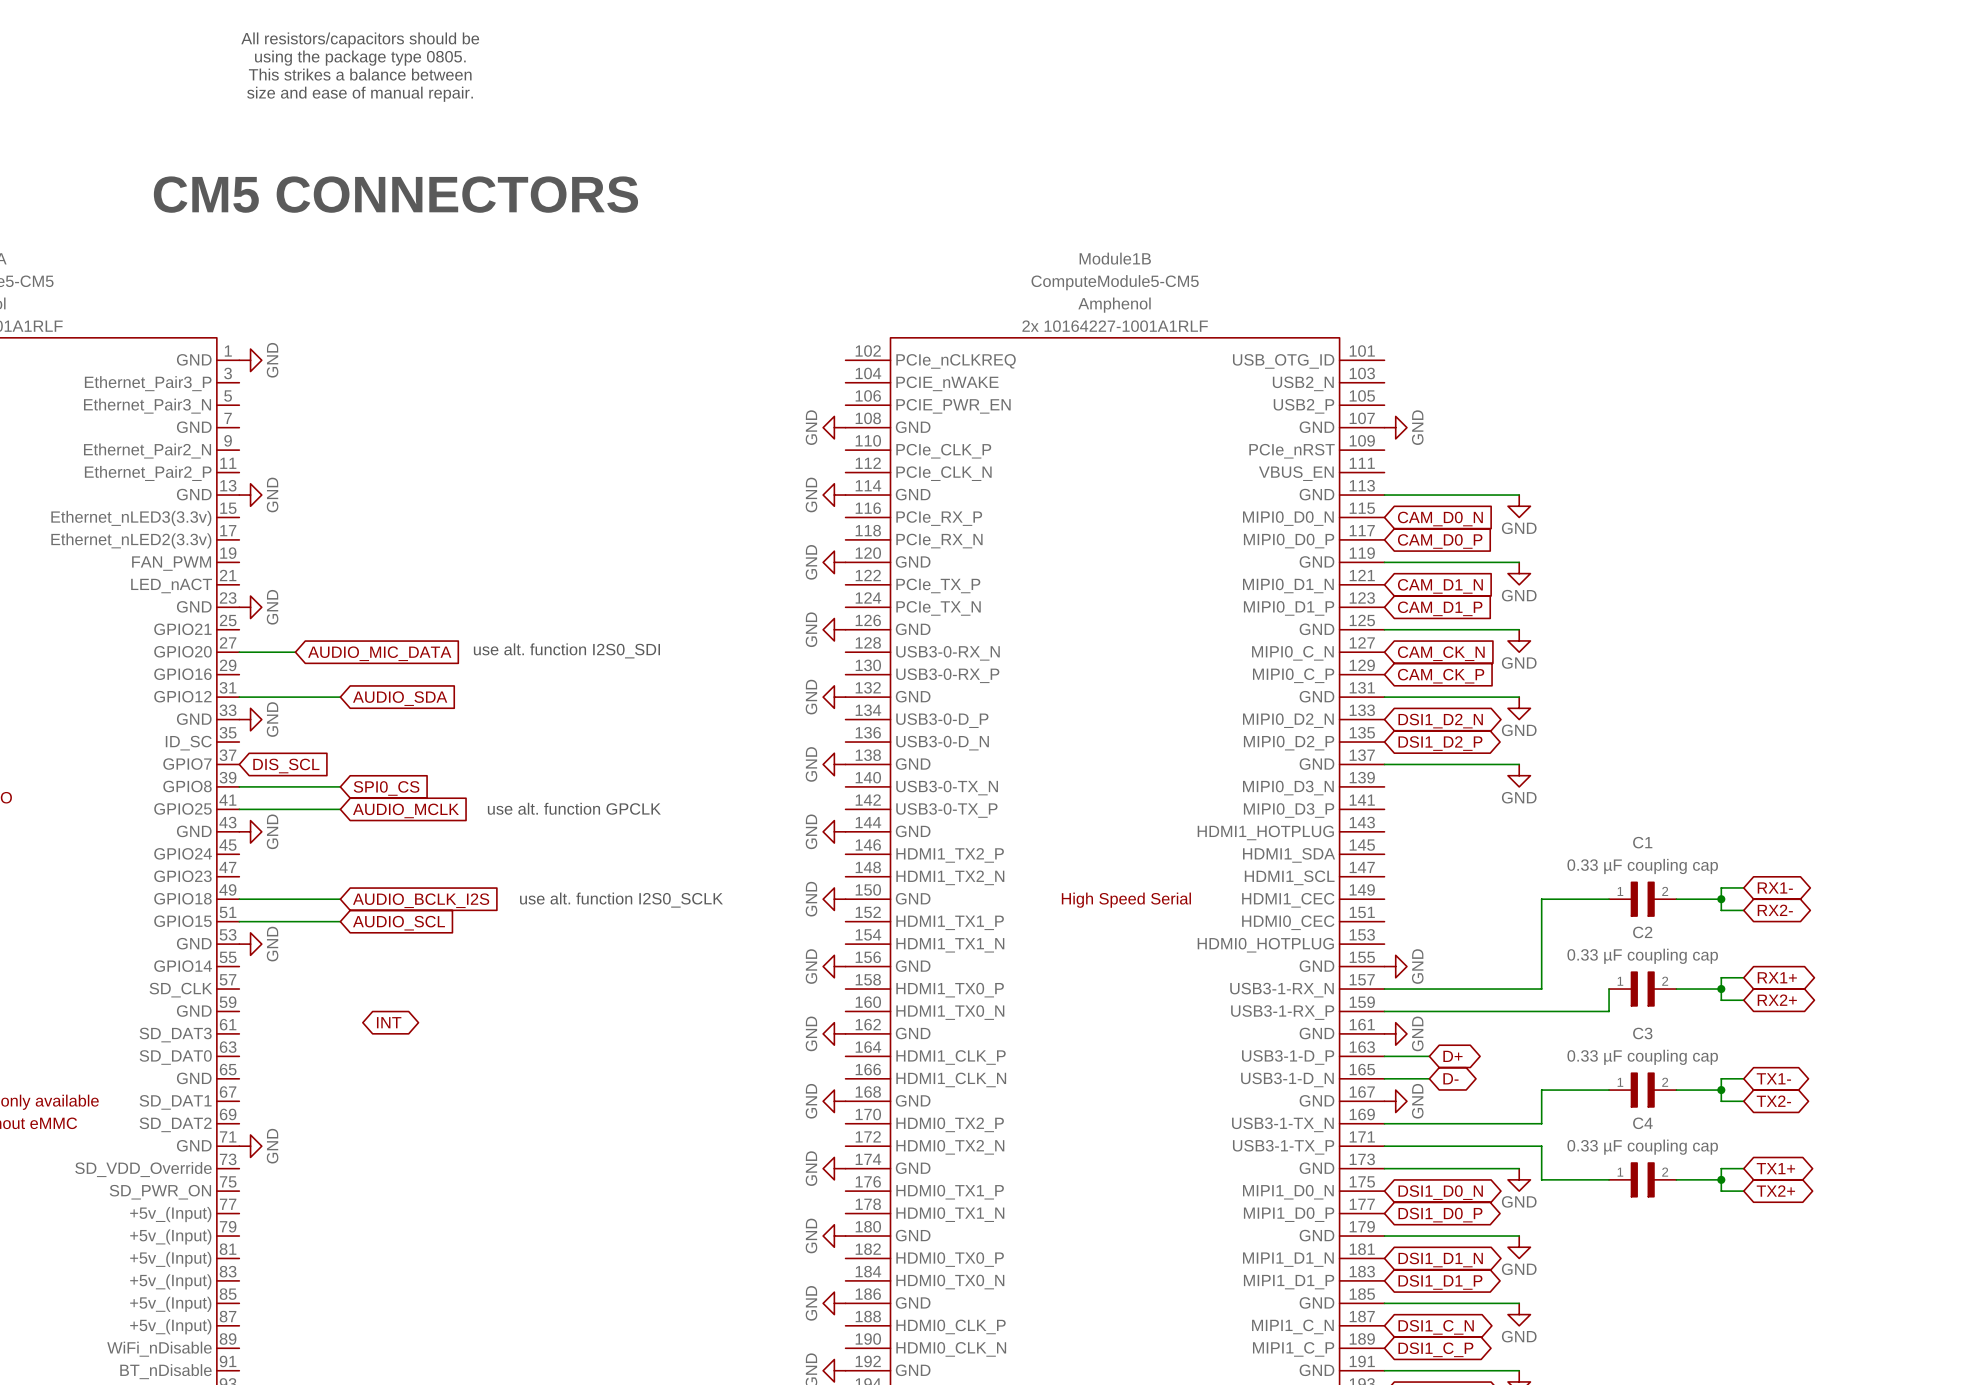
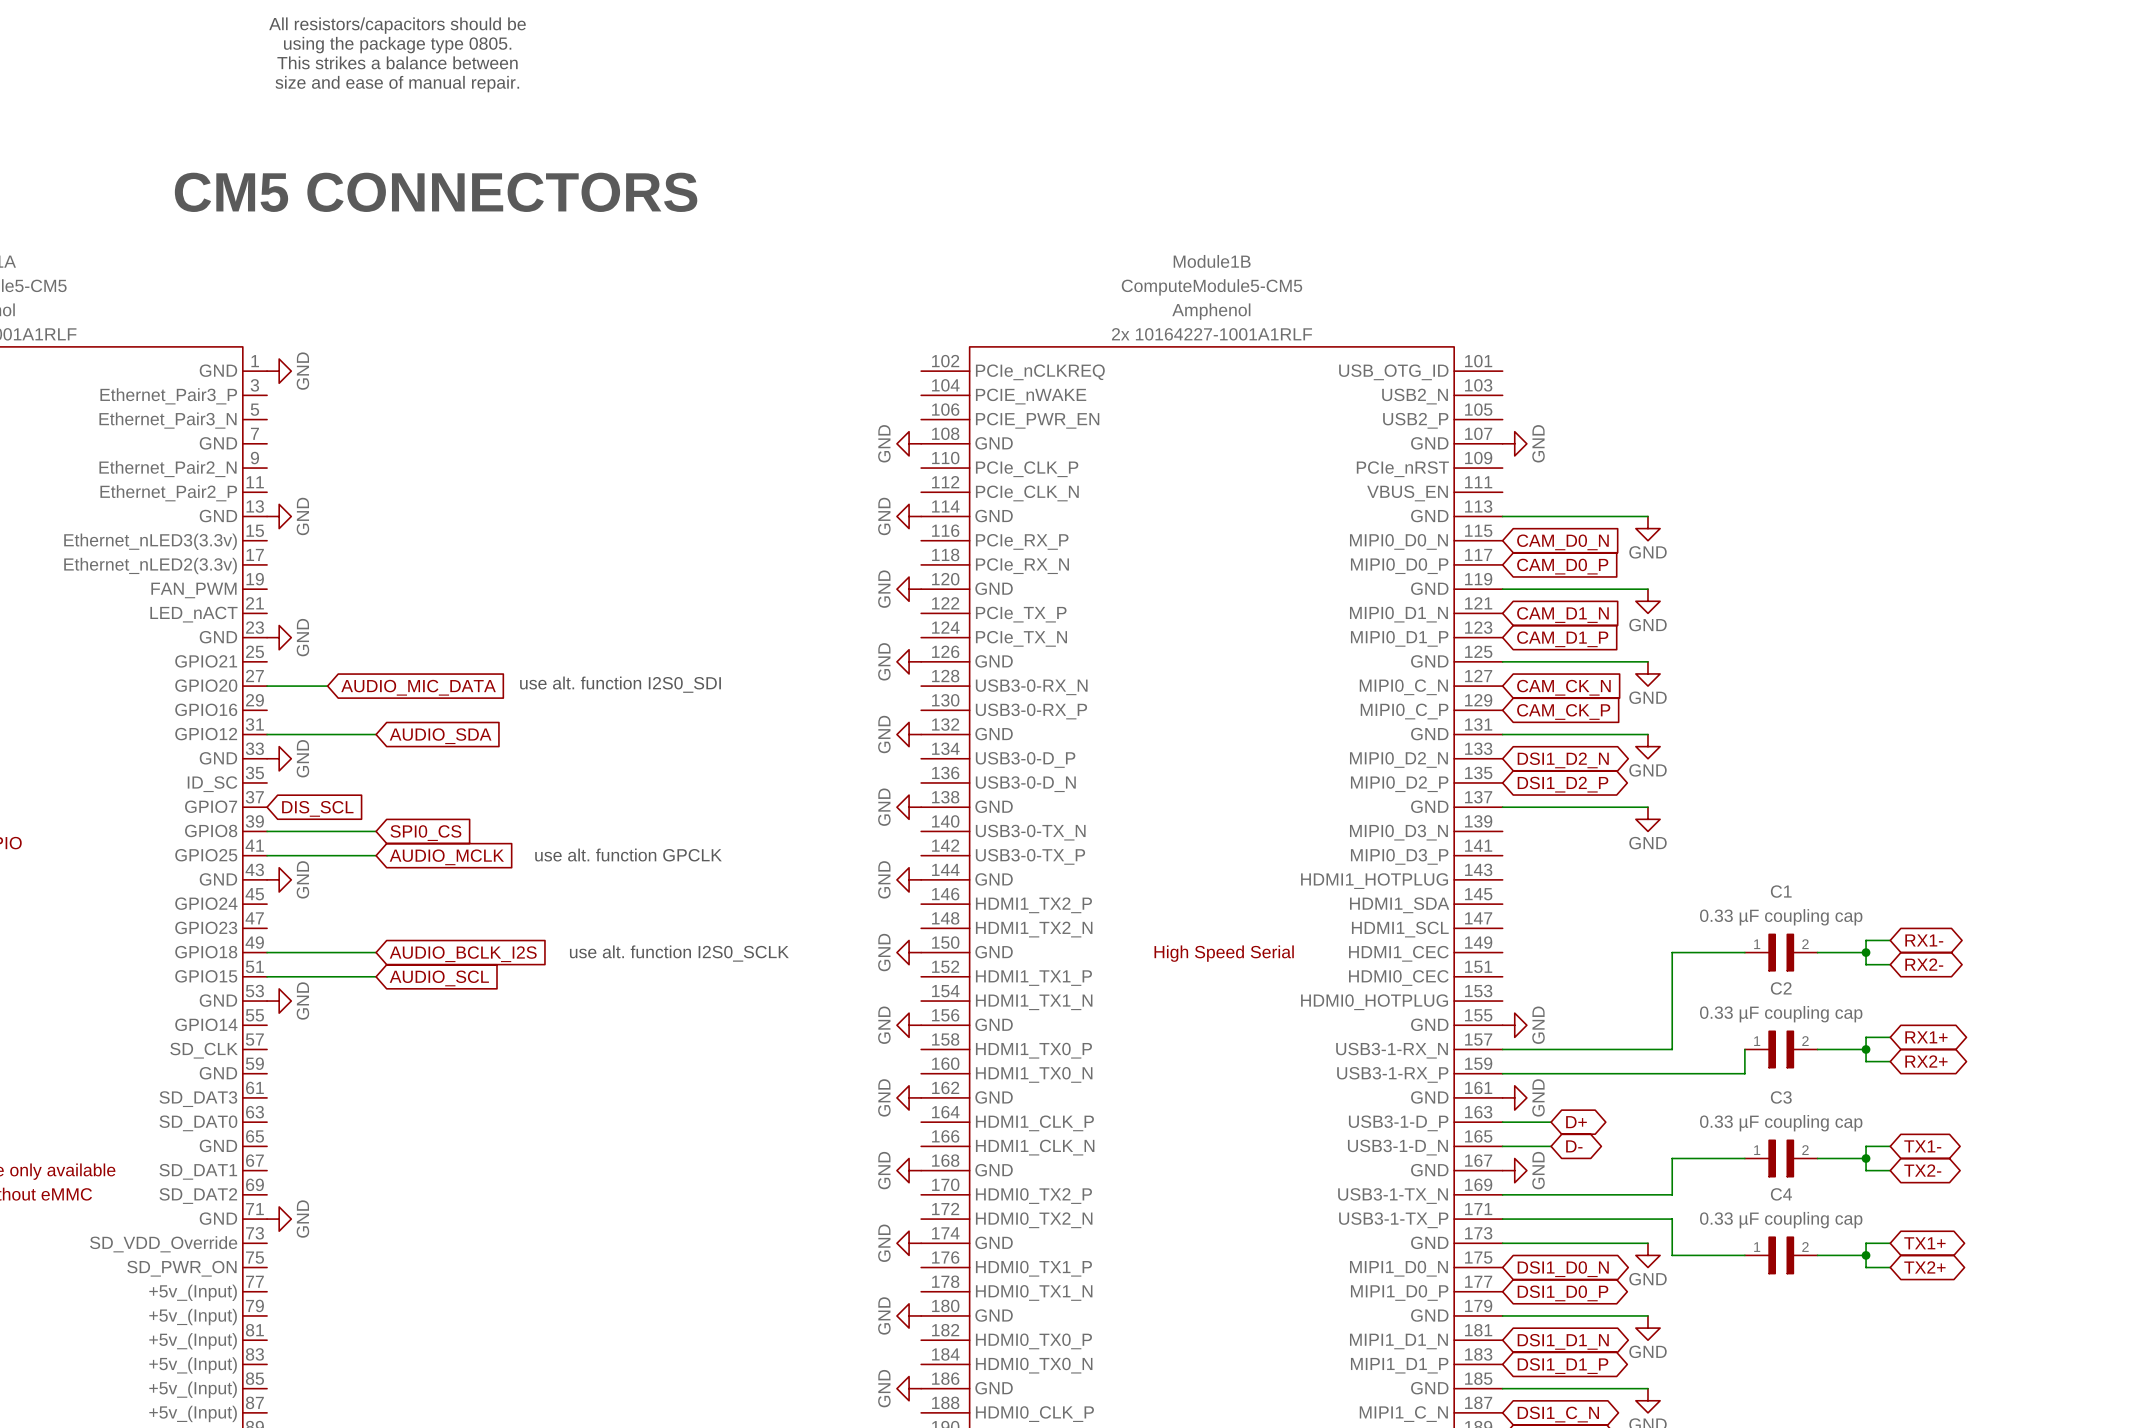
global label: INT (389, 1022) -> none

